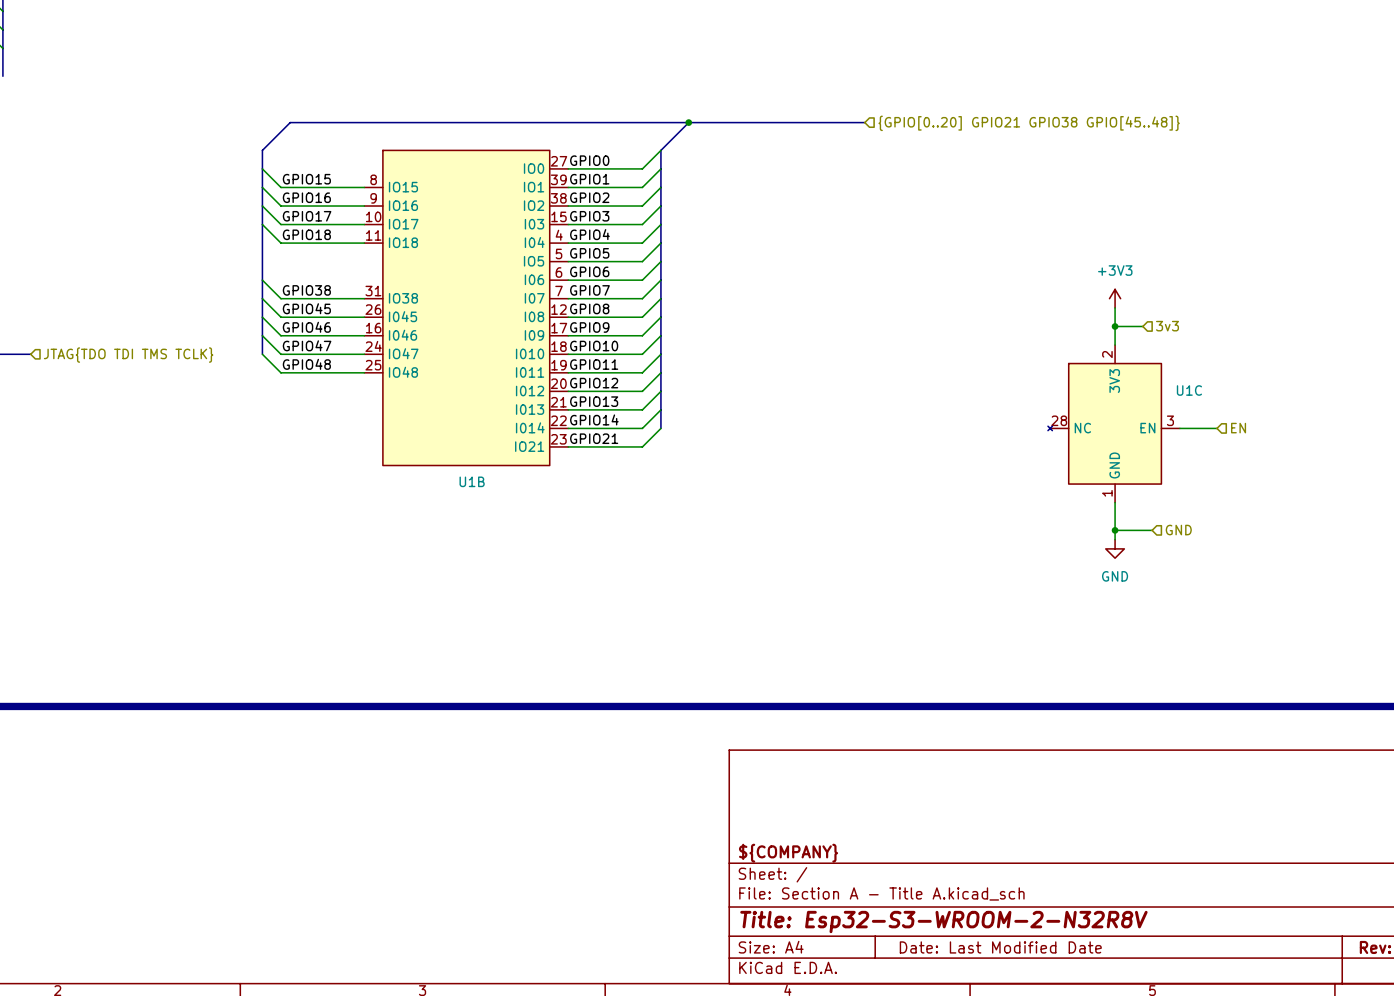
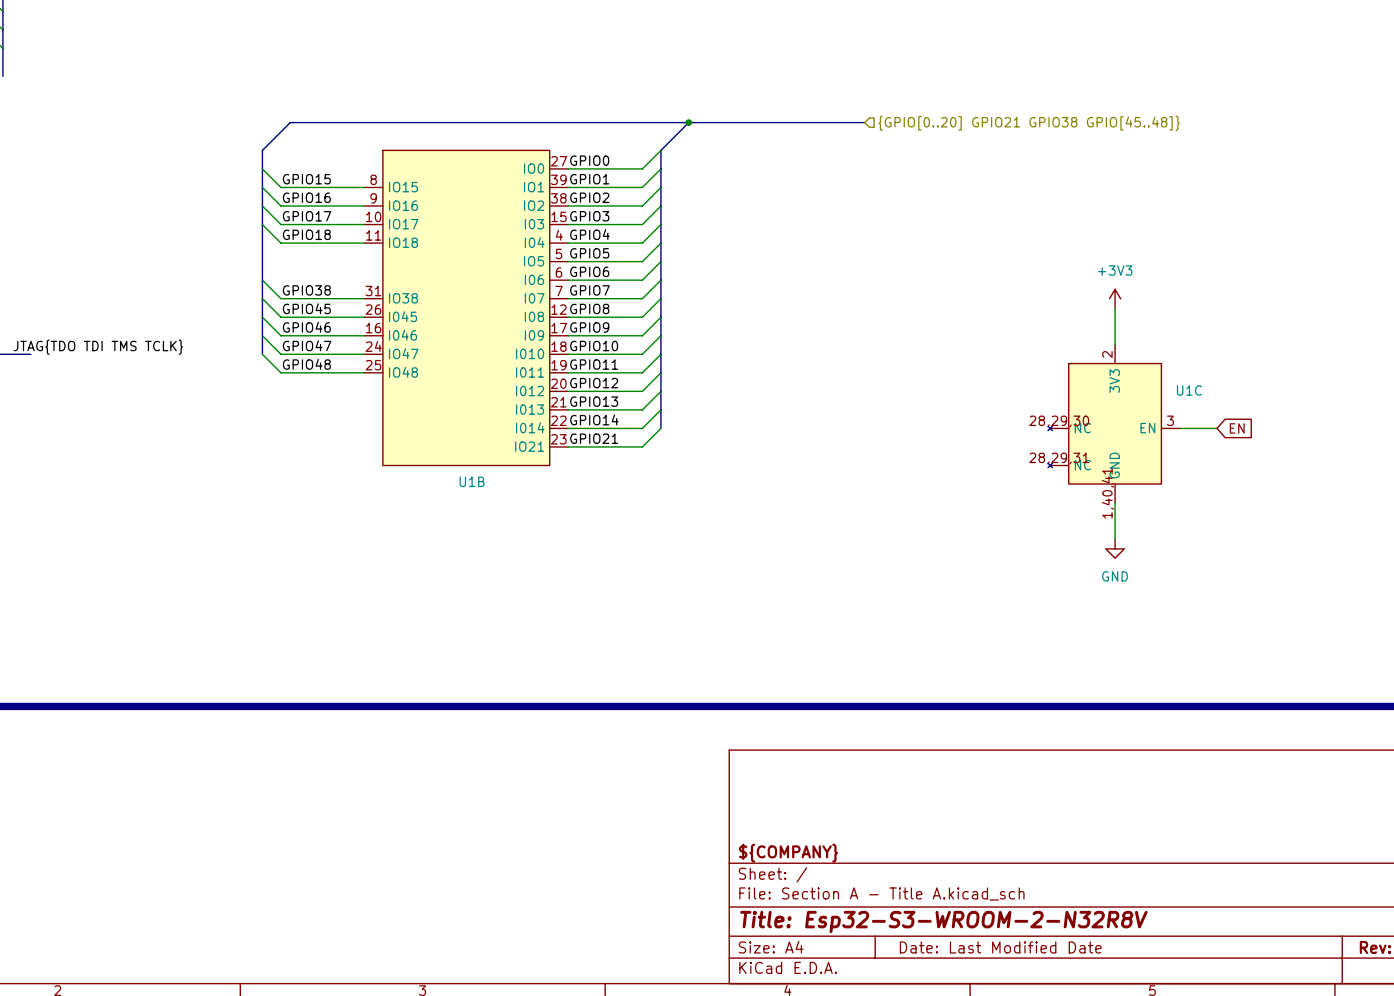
wire: (1115, 326) (1142, 326) -> none
junction: (1115, 326) -> none
hierarchical label: 3v3 (1167, 326) -> none
U1C symbol: [1048, 345, 1180, 503] -> [1048, 345, 1180, 503]
label: none -> JTAG{TDO TDI TMS TCLK} (98, 347)
hierarchical label: JTAG{TDO TDI TMS TCLK} (128, 355) -> none
global label: none -> EN (1237, 428)
hierarchical label: EN (1238, 428) -> none
wire: (1115, 530) (1152, 530) -> none
junction: (1115, 530) -> none
hierarchical label: GND (1178, 530) -> none

